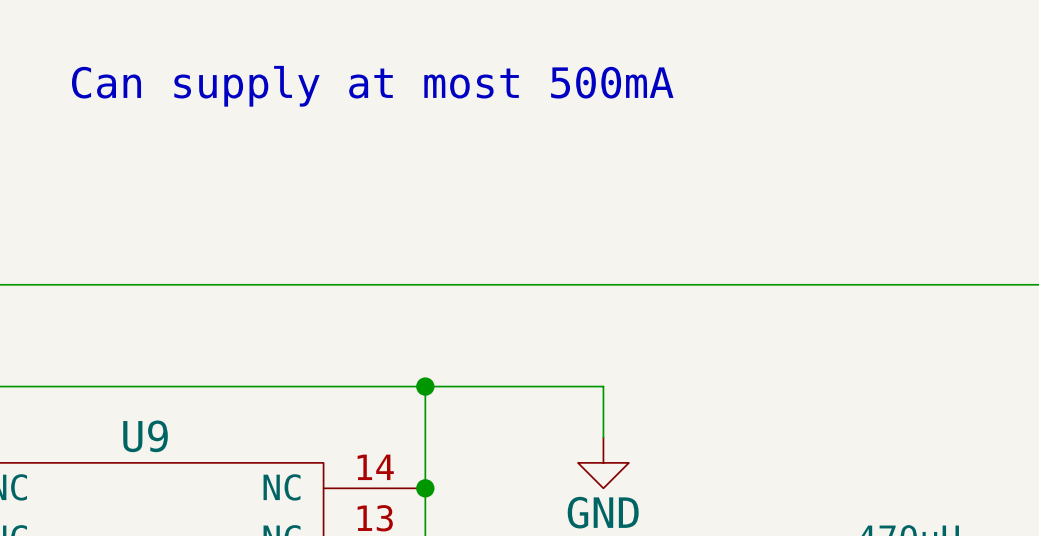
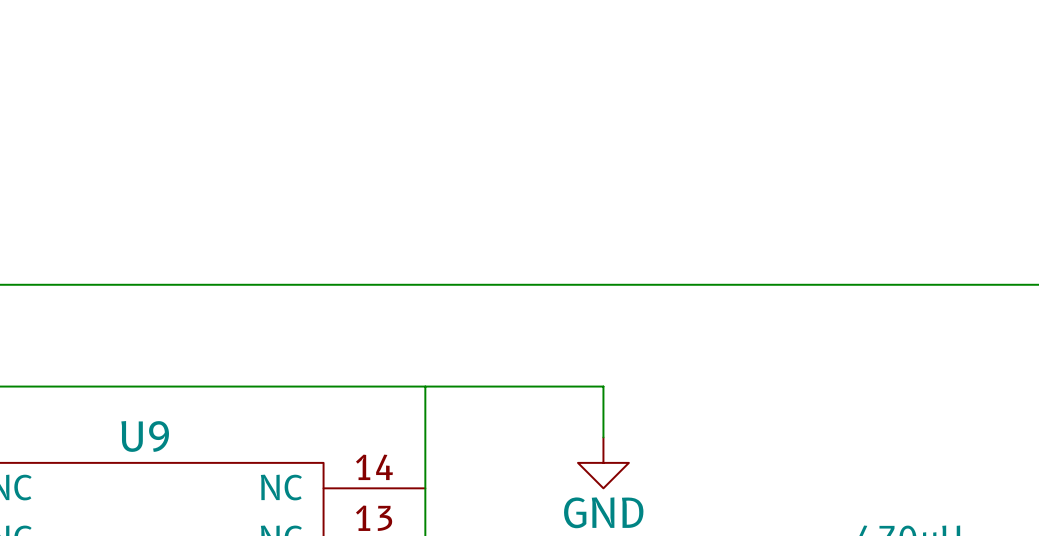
text: Can supply at most 500mA (372, 86) -> none
junction: (425, 386) -> none
junction: (425, 488) -> none

